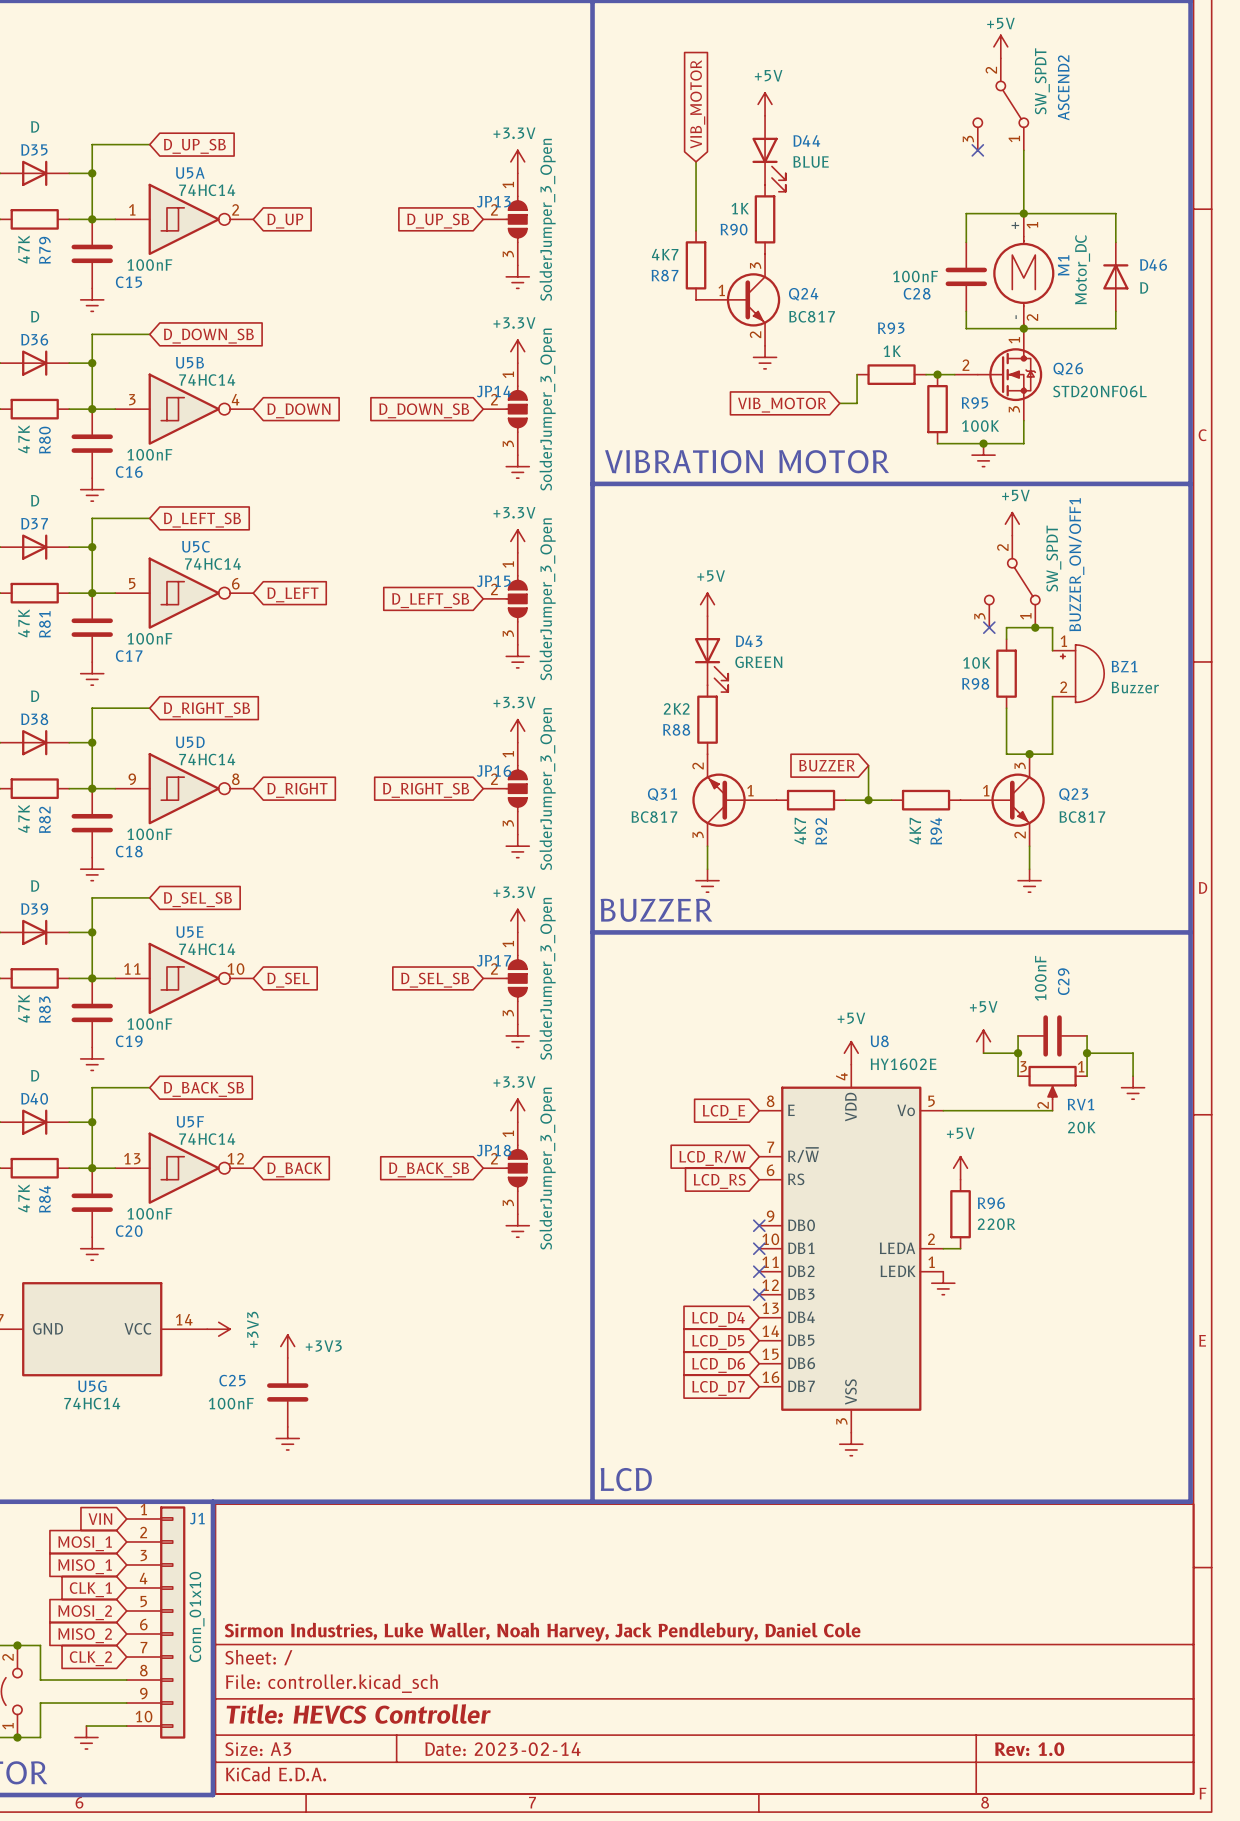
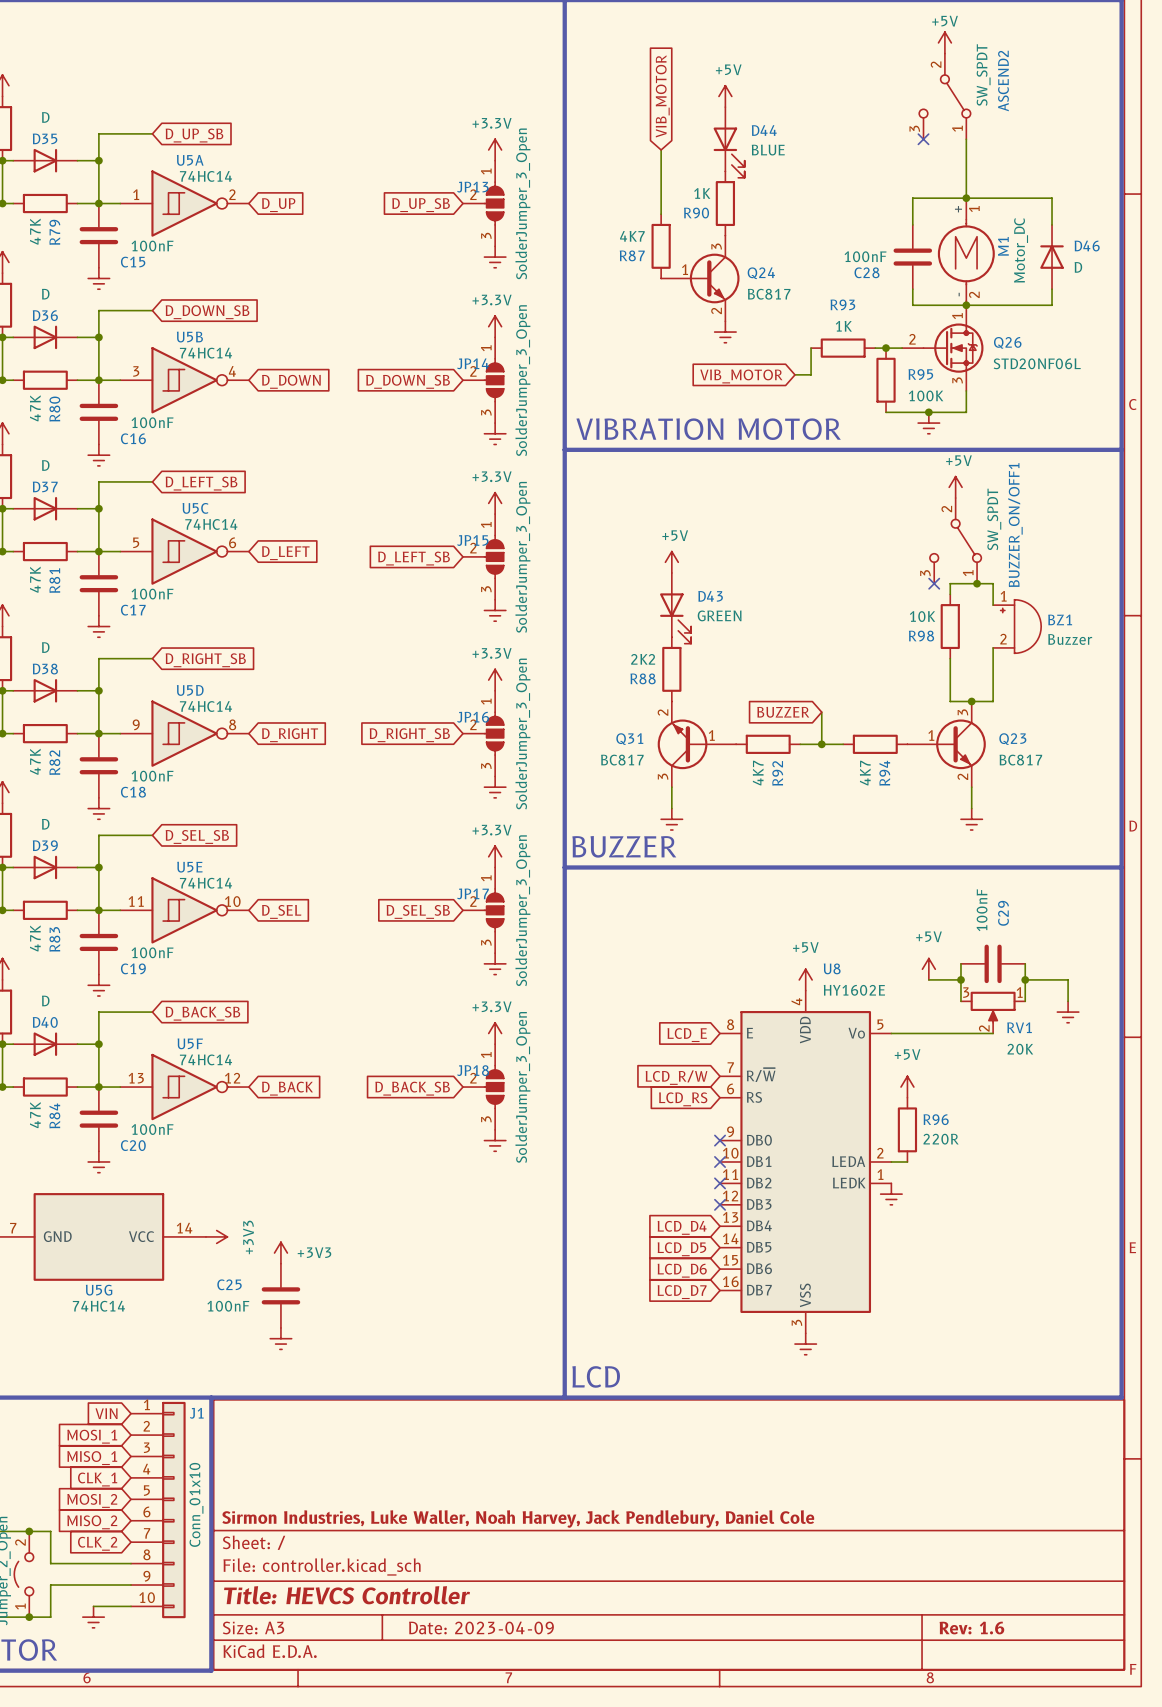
title block: Date: 2023-02-14 (502, 1749) -> Date: 2023-04-09 (481, 1627)
title block: Rev: 1.0 (1029, 1749) -> Rev: 1.6 (971, 1628)

